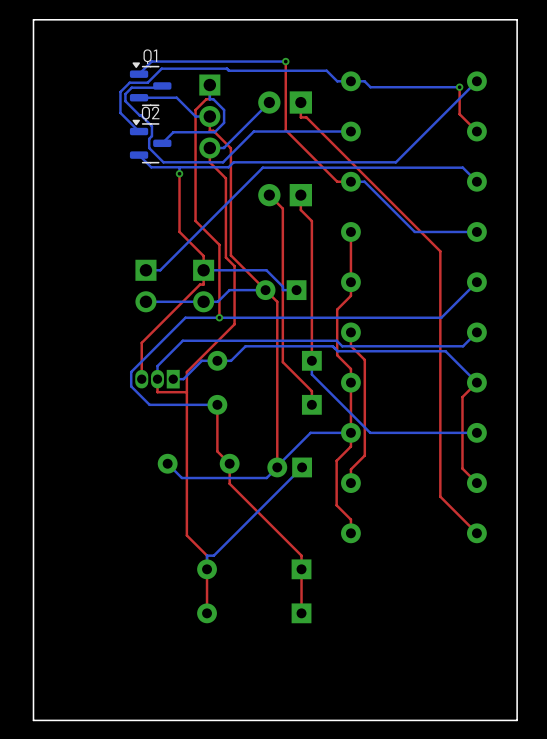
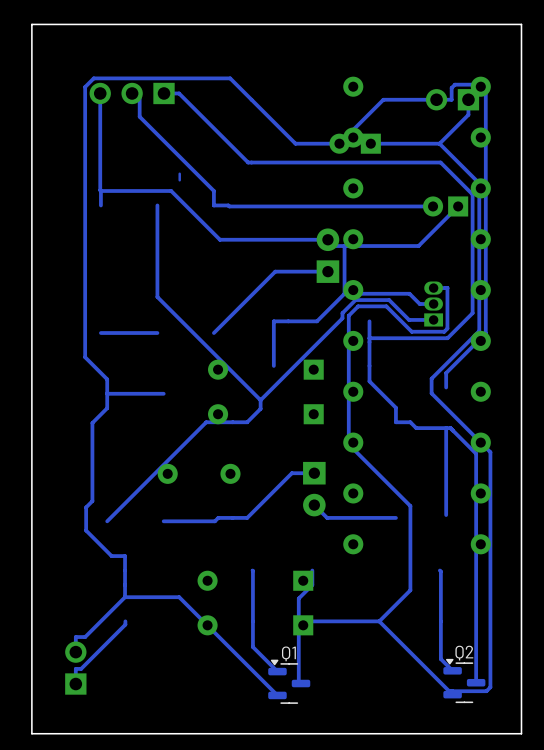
top track: (285, 61) (285, 130) (337, 181) (350, 181) -> none
bottom track: (285, 61) (151, 61) (139, 74) -> none
via: (285, 61) -> none
bottom track: (476, 81) (395, 162) (233, 162) (228, 167) (151, 167) (139, 155) -> none
Q1 position: (150, 84) -> (289, 681)
bottom track: (162, 85) (160, 87) (131, 87) (125, 94) (125, 101) (151, 126) (149, 148) (163, 162) (223, 162) (253, 131) (350, 131) -> none
top track: (209, 85) (209, 99) (206, 99) (195, 110) (195, 220) (219, 244) (219, 317) -> none
bottom track: (209, 85) (209, 99) (213, 99) (224, 110) (224, 122) (214, 132) (173, 132) (162, 143) -> none
top track: (459, 87) (459, 114) (476, 131) -> none
bottom track: (459, 87) (370, 87) (364, 81) (337, 81) (326, 70) (161, 68) (147, 82) (129, 82) (120, 91) (120, 112) (139, 131) -> none
via: (459, 87) -> none
bottom track: none -> (100, 93) (100, 190)
bottom track: none -> (139, 93) (139, 116) (213, 191) (213, 205) (433, 206)
bottom track: none -> (164, 93) (179, 93) (248, 162) (440, 162) (472, 194) (472, 313) (447, 338) (369, 338)
part: none -> (452, 99)
bottom track: none -> (468, 99) (468, 114) (439, 143)
bottom track: (139, 97) (176, 97) (195, 116) (209, 116) -> none
bottom track: (269, 102) (224, 148) (209, 148) -> none
part: (285, 102) -> none
top track: (300, 102) (300, 117) (306, 117) (440, 251) (440, 496) (476, 533) -> none
top track: (209, 116) (209, 130) (213, 130) (230, 148) (230, 255) (277, 301) (277, 467) -> none
part rotation: 0° (209, 116) -> 90° clockwise (132, 93)
part position: (209, 116) -> (132, 93)
bottom track: none -> (439, 143) (370, 143)
bottom track: none -> (439, 143) (479, 183) (479, 331) (431, 378) (431, 393) (490, 452) (490, 687) (486, 691) (449, 691) (379, 621)
Q2 position: (150, 141) -> (464, 680)
top track: (209, 148) (209, 162) (225, 178) (225, 257) (234, 266) (234, 324) (186, 372) (186, 535) (207, 555) (207, 613) -> none
top track: (179, 173) (179, 231) (203, 256) (203, 284) (200, 284) (141, 342) (141, 379) -> none
via: (179, 173) -> none
bottom track: (350, 181) (364, 181) (414, 231) (476, 231) -> none
bottom track: (476, 181) (462, 167) (262, 167) (160, 270) (145, 270) -> none
bottom track: none -> (100, 190) (171, 190) (219, 239) (327, 239) (334, 246) (418, 246) (458, 206)
bottom track: none -> (100, 190) (100, 205)
top track: (269, 195) (282, 208) (282, 362) (311, 391) (311, 404) -> none
part rotation: 0° (285, 195) -> 90° clockwise (327, 255)
part position: (285, 195) -> (327, 255)
top track: (300, 195) (300, 210) (311, 221) (311, 360) -> none
bottom track: none -> (157, 205) (157, 297) (260, 400)
top track: (350, 231) (350, 295) (337, 309) (337, 355) (350, 368) (350, 446) (336, 460) (336, 505) (350, 519) (350, 533) -> none
bottom track: none -> (344, 246) (344, 293)
bottom track: none -> (327, 271) (275, 271) (213, 333)
bottom track: (203, 270) (266, 270) (282, 286) (282, 290) (296, 290) -> none
bottom track: none -> (433, 288) (447, 288) (447, 328) (444, 331) (411, 331) (386, 306) (358, 306) (348, 315) (348, 444) (410, 506) (410, 590) (379, 621)
bottom track: (476, 282) (441, 317) (185, 317) (131, 372) (131, 386) (149, 404) (217, 404) -> none
bottom track: none -> (344, 293) (316, 321) (273, 321) (273, 365)
bottom track: none -> (344, 293) (409, 293) (419, 304) (433, 304)
part: (145, 286) -> none
part: (203, 286) -> none
bottom track: (265, 290) (229, 290) (217, 301) (145, 301) -> none
part position: (281, 290) -> (355, 143)
bottom track: none -> (433, 319) (409, 319) (389, 300) (355, 300) (342, 313) (342, 318) (260, 400)
bottom track: none -> (369, 321) (369, 381) (395, 407) (395, 422) (410, 422) (416, 428) (450, 428) (476, 453) (476, 682)
via: (219, 317) -> none
bottom track: none -> (157, 333) (100, 333)
top track: (350, 332) (350, 346) (364, 359) (364, 455) (350, 469) (350, 483) -> none
bottom track: (476, 332) (463, 346) (342, 346) (336, 340) (182, 340) (157, 366) (157, 379) -> none
bottom track: (311, 360) (311, 374) (370, 432) (476, 432) -> none
bottom track: none -> (446, 387) (446, 373) (485, 333) (485, 89) (481, 84) (454, 84) (451, 87) (451, 99) (383, 99) (339, 143) (295, 143) (230, 78) (93, 78) (85, 87) (85, 357) (107, 379) (107, 408) (92, 423) (92, 501) (86, 507) (86, 530) (111, 556) (125, 556) (125, 597)
top track: (157, 379) (157, 392) (186, 392) -> none
part rotation: 0° (157, 379) -> 90° clockwise (433, 304)
part position: (157, 379) -> (433, 304)
bottom track: (173, 379) (183, 379) (201, 360) (231, 360) (245, 346) (332, 346) (337, 351) (445, 351) (476, 382) -> none
top track: (476, 382) (462, 397) (462, 468) (476, 483) -> none
bottom track: none -> (163, 393) (107, 393)
bottom track: none -> (260, 400) (260, 408) (247, 422) (206, 422) (107, 521)
top track: (217, 404) (217, 451) (229, 463) (229, 483) (301, 555) (301, 613) -> none
bottom track: none -> (446, 428) (446, 515)
bottom track: (350, 432) (310, 432) (266, 478) (181, 478) (167, 463) -> none
bottom track: none -> (314, 473) (291, 473) (247, 517) (218, 517) (214, 521) (163, 521)
part position: (289, 467) -> (445, 206)
bottom track: (302, 467) (213, 555) (207, 555) (207, 569) -> none
part: none -> (314, 489)
bottom track: none -> (314, 505) (327, 517) (395, 517)
bottom track: none -> (252, 570) (252, 647) (277, 671)
bottom track: none -> (312, 570) (312, 584) (298, 598) (298, 681) (301, 683)
bottom track: none -> (439, 570) (440, 659) (452, 670)
bottom track: none -> (125, 597) (85, 637) (75, 637) (75, 652)
bottom track: none -> (125, 597) (179, 597) (277, 695)
bottom track: none -> (125, 621) (125, 624) (81, 668) (75, 668) (75, 684)
bottom track: none -> (379, 621) (313, 621)
part: none -> (75, 668)

